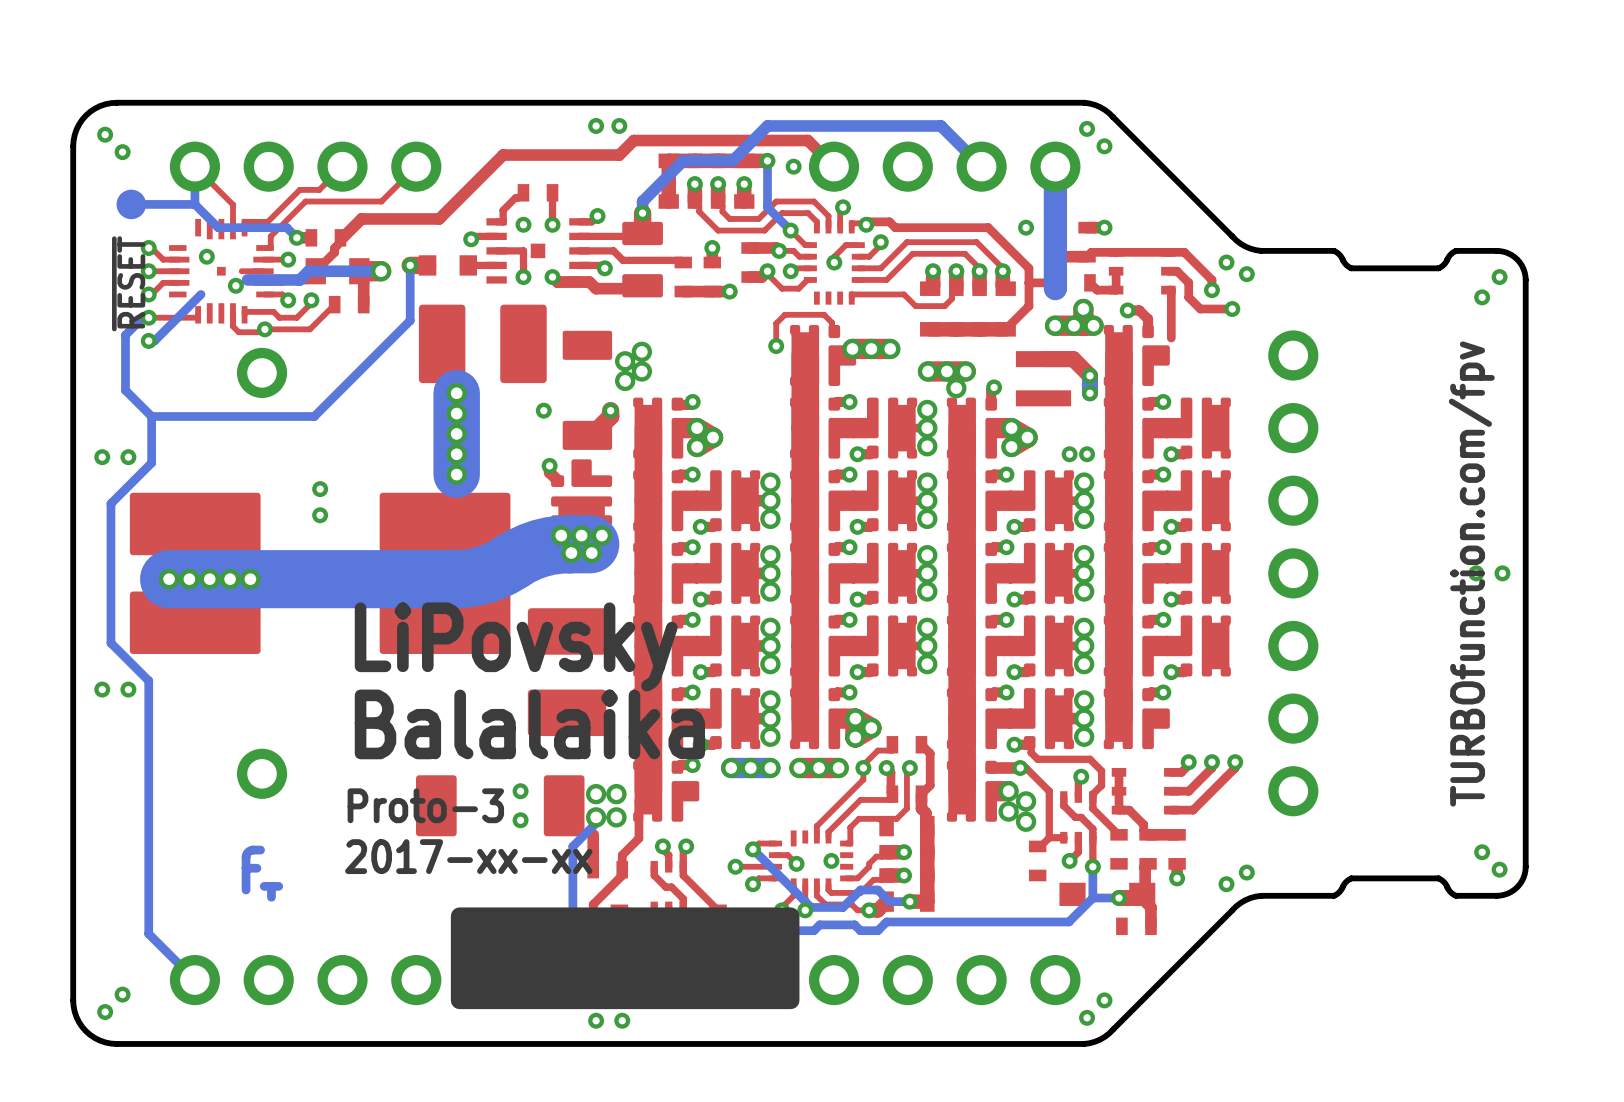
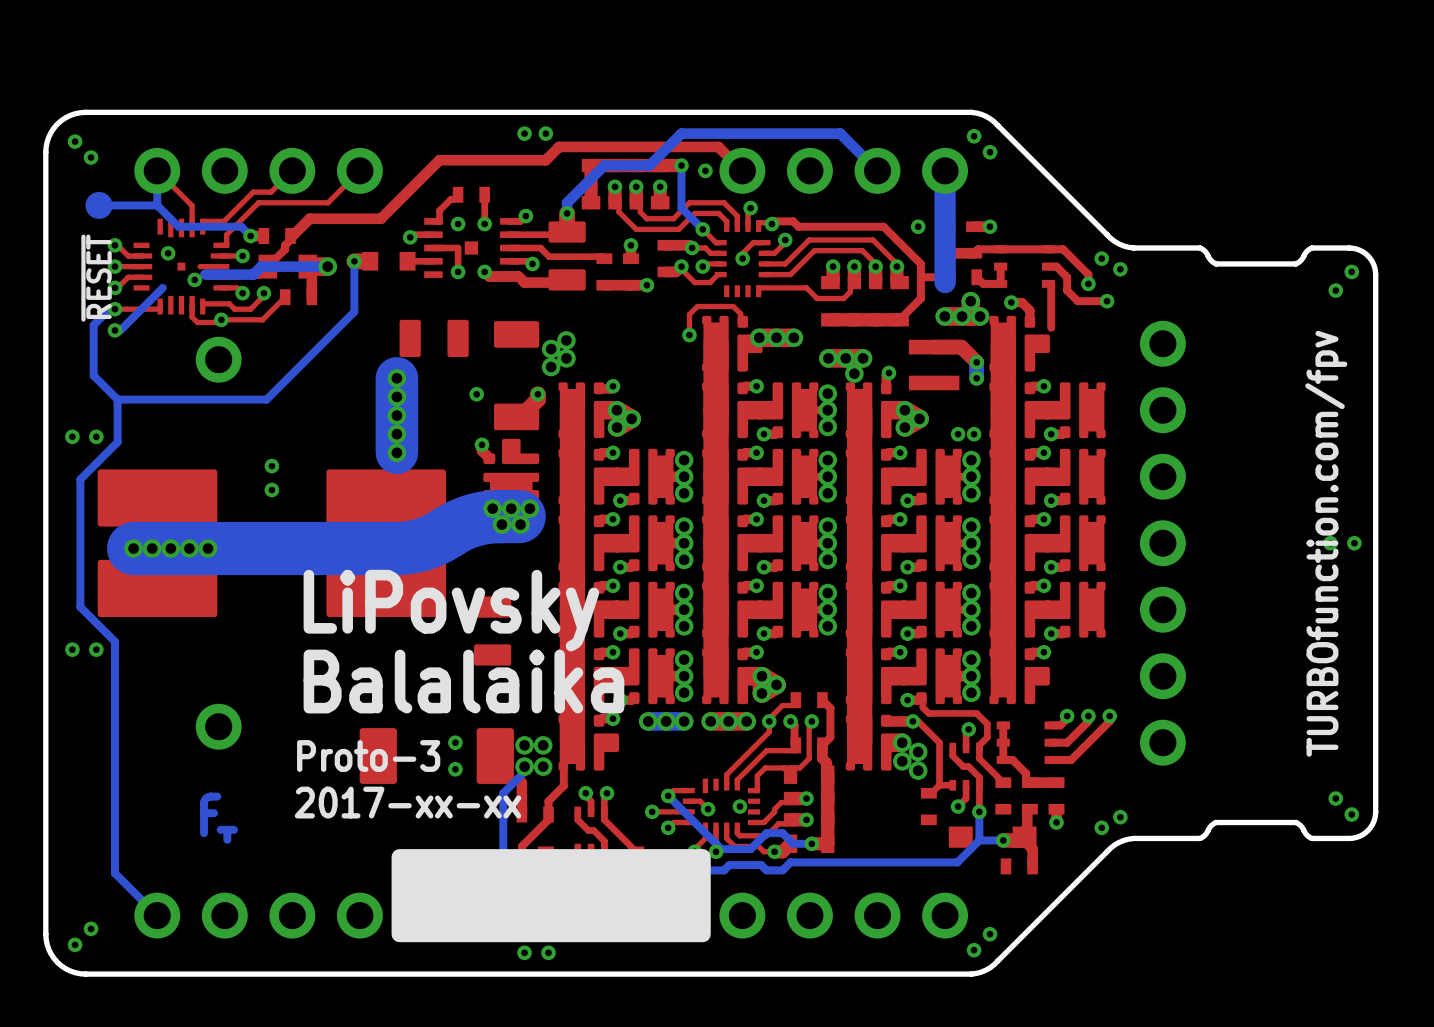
part footprint: [418, 304, 547, 384] -> [399, 319, 469, 358]
part footprint: [527, 608, 607, 737] -> [474, 596, 512, 666]

